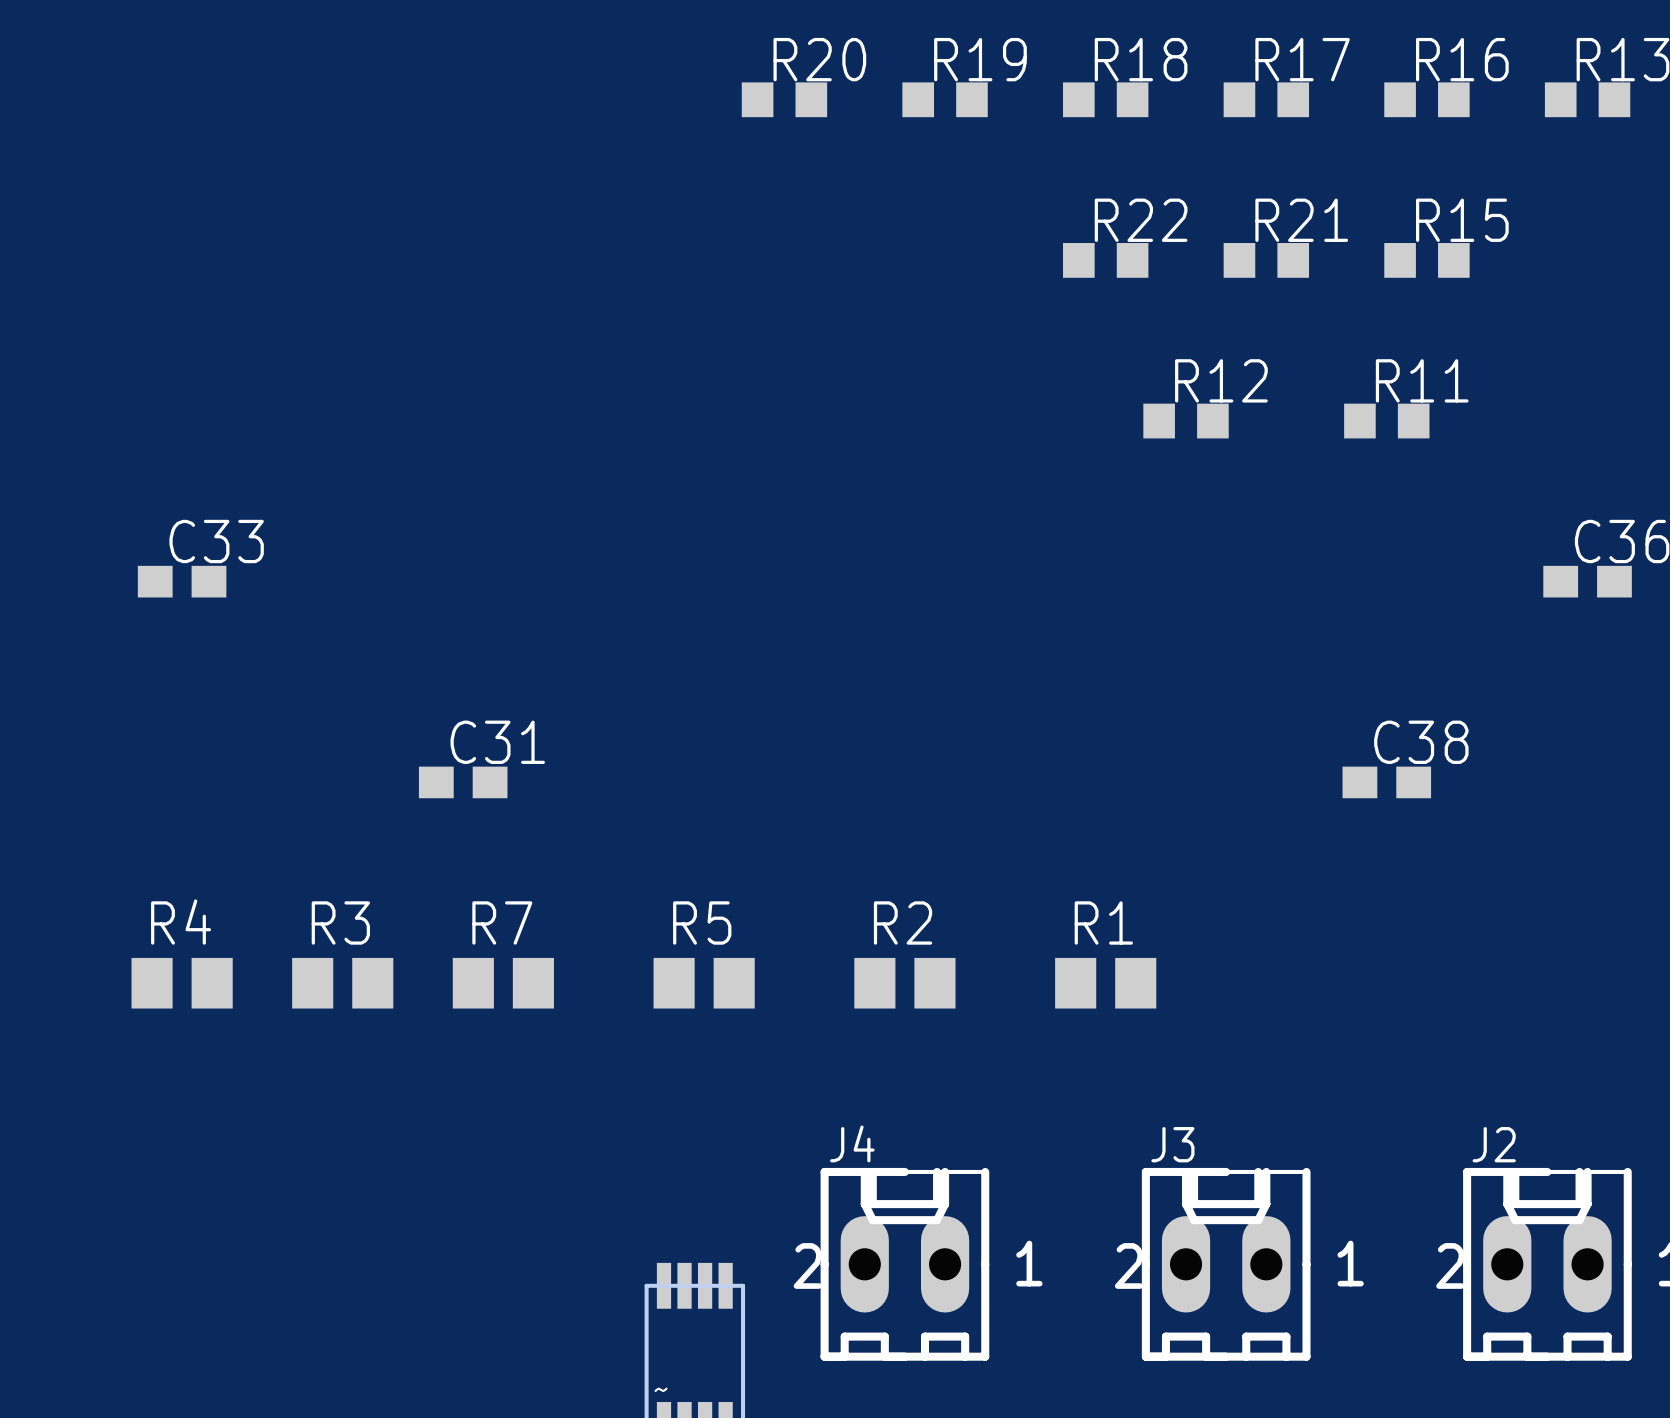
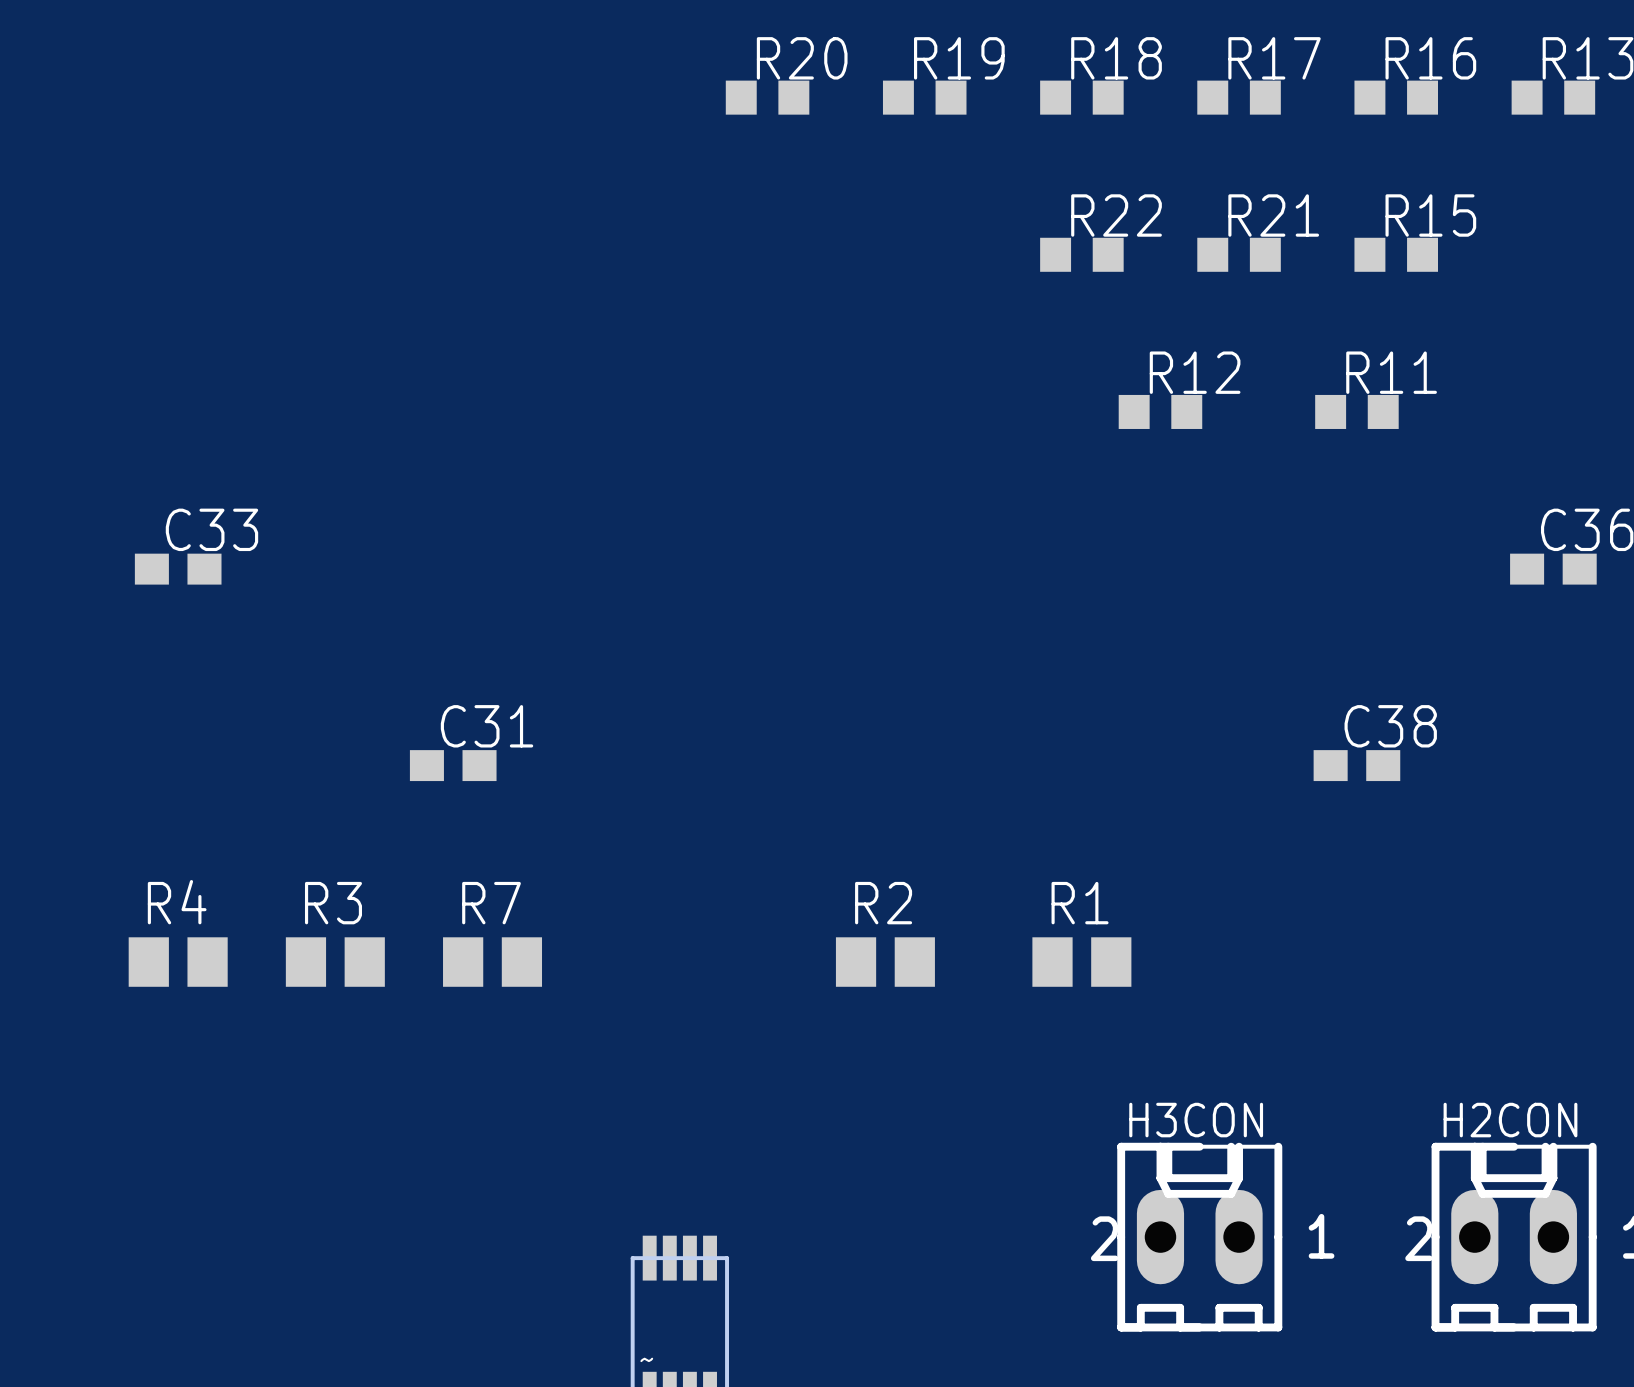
R5: (704, 983) -> none
J3 name: J3 (1172, 1144) -> H3CON (1196, 1120)
J2 name: J2 (1494, 1144) -> H2CON (1510, 1120)
J4: (904, 1264) -> none

